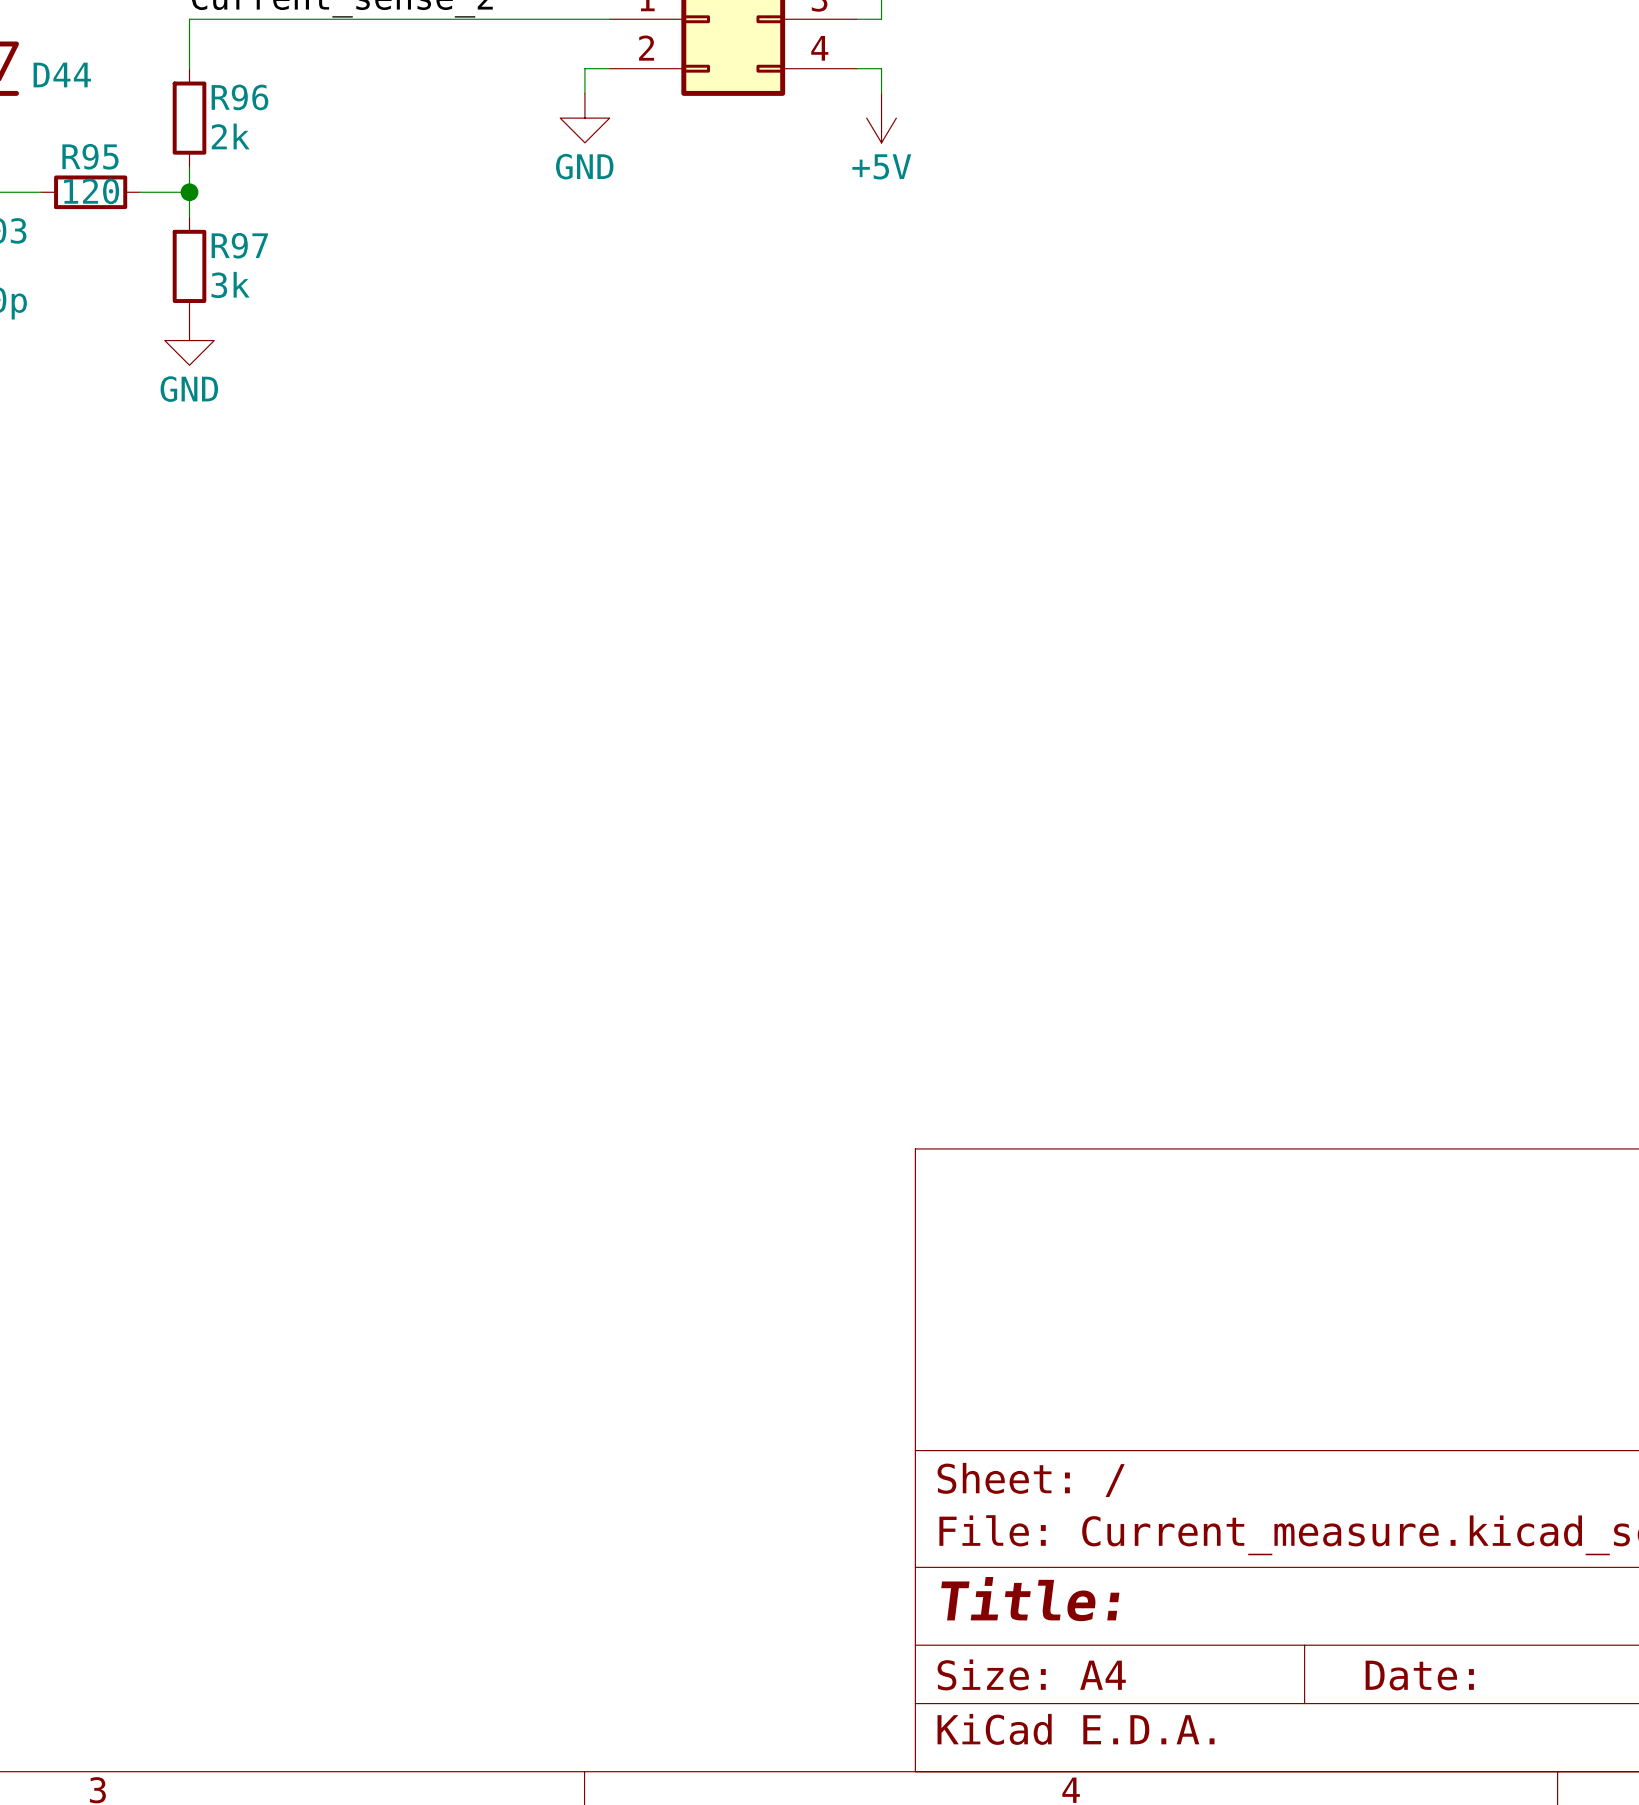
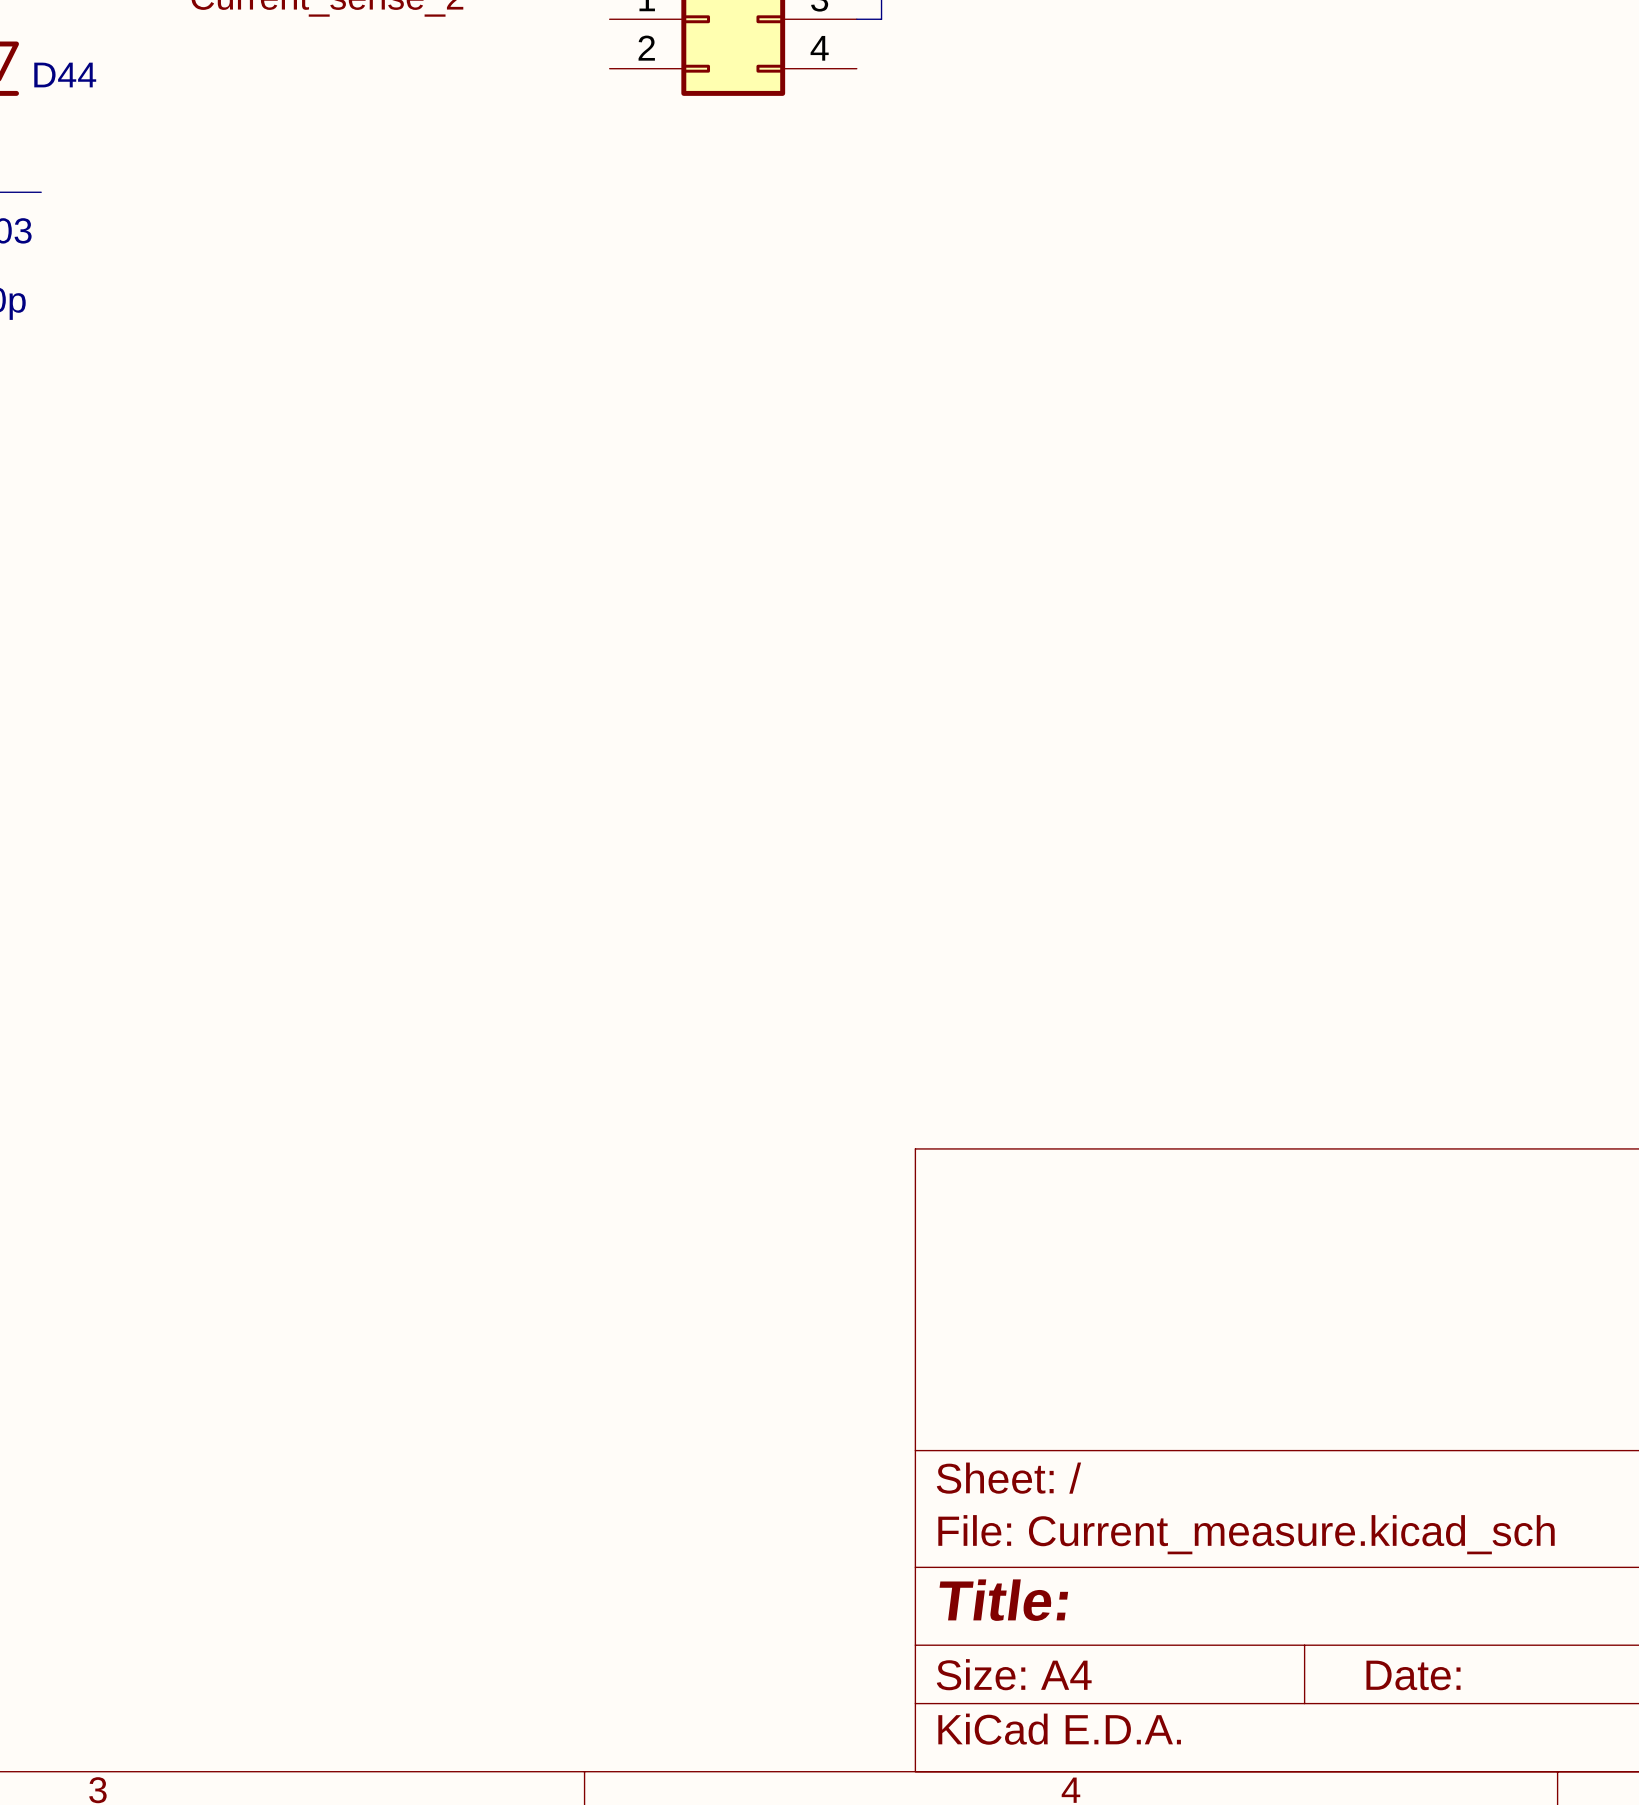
wire: (609, 19) (189, 19) (189, 68) -> none
wire: (609, 68) (584, 68) (584, 93) -> none
wire: (856, 68) (881, 68) (881, 93) -> none
R96: 2k (189, 118) -> none
power symbol: GND (584, 118) -> none
power symbol: +5V (881, 118) -> none
wire: (189, 167) (189, 216) -> none
R95: 120 (90, 192) -> none
wire: (140, 192) (189, 192) -> none
junction: (189, 192) -> none
R97: 3k (189, 266) -> none
power symbol: GND (189, 340) -> none

